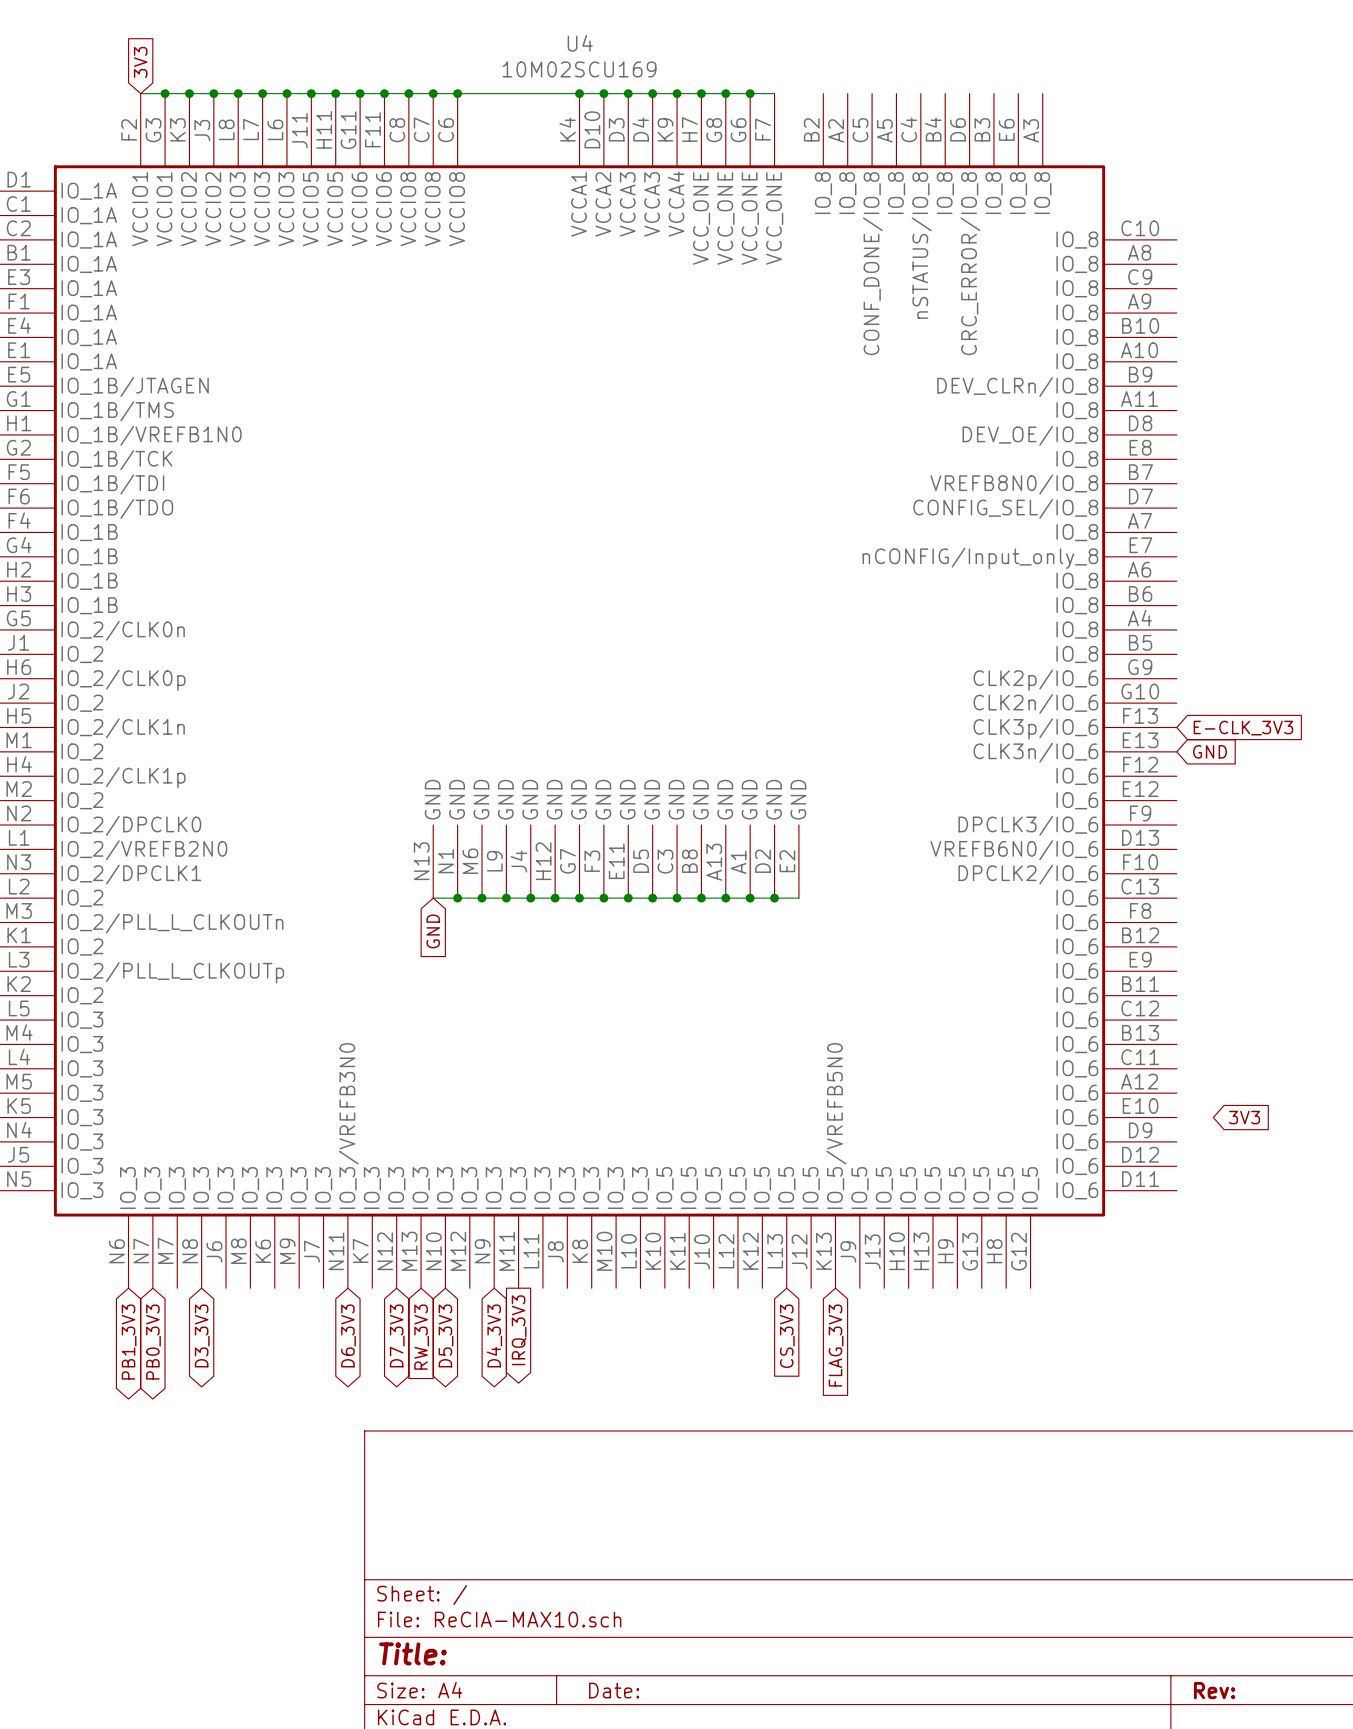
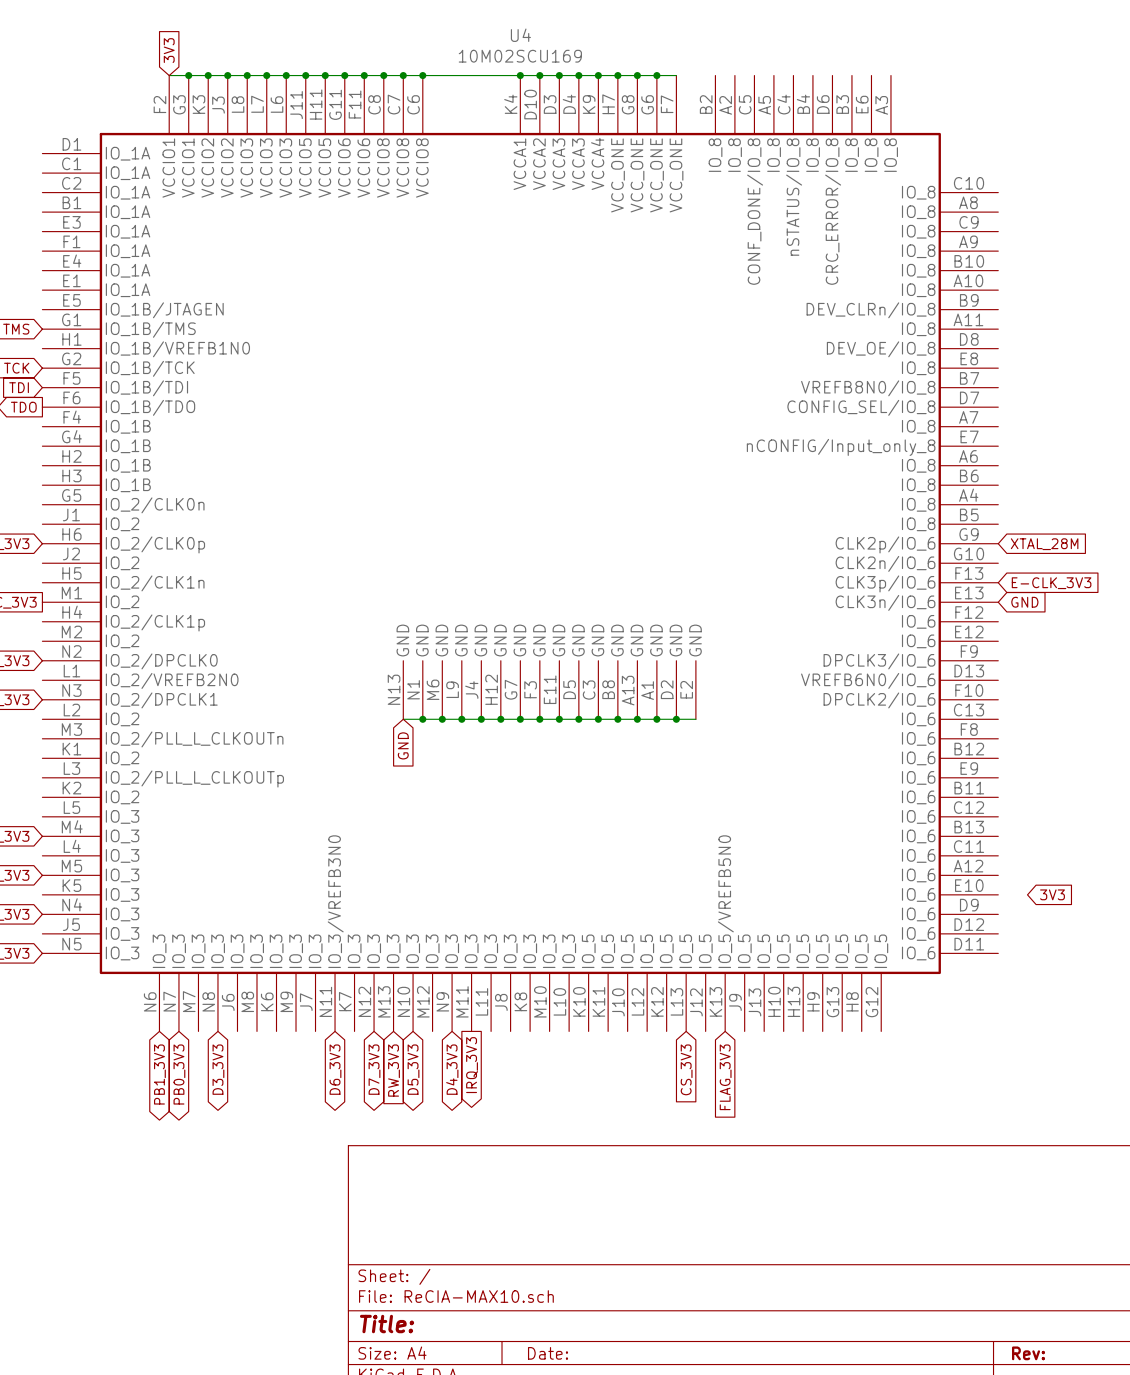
global label: none -> XTAL_28M (1044, 544)

